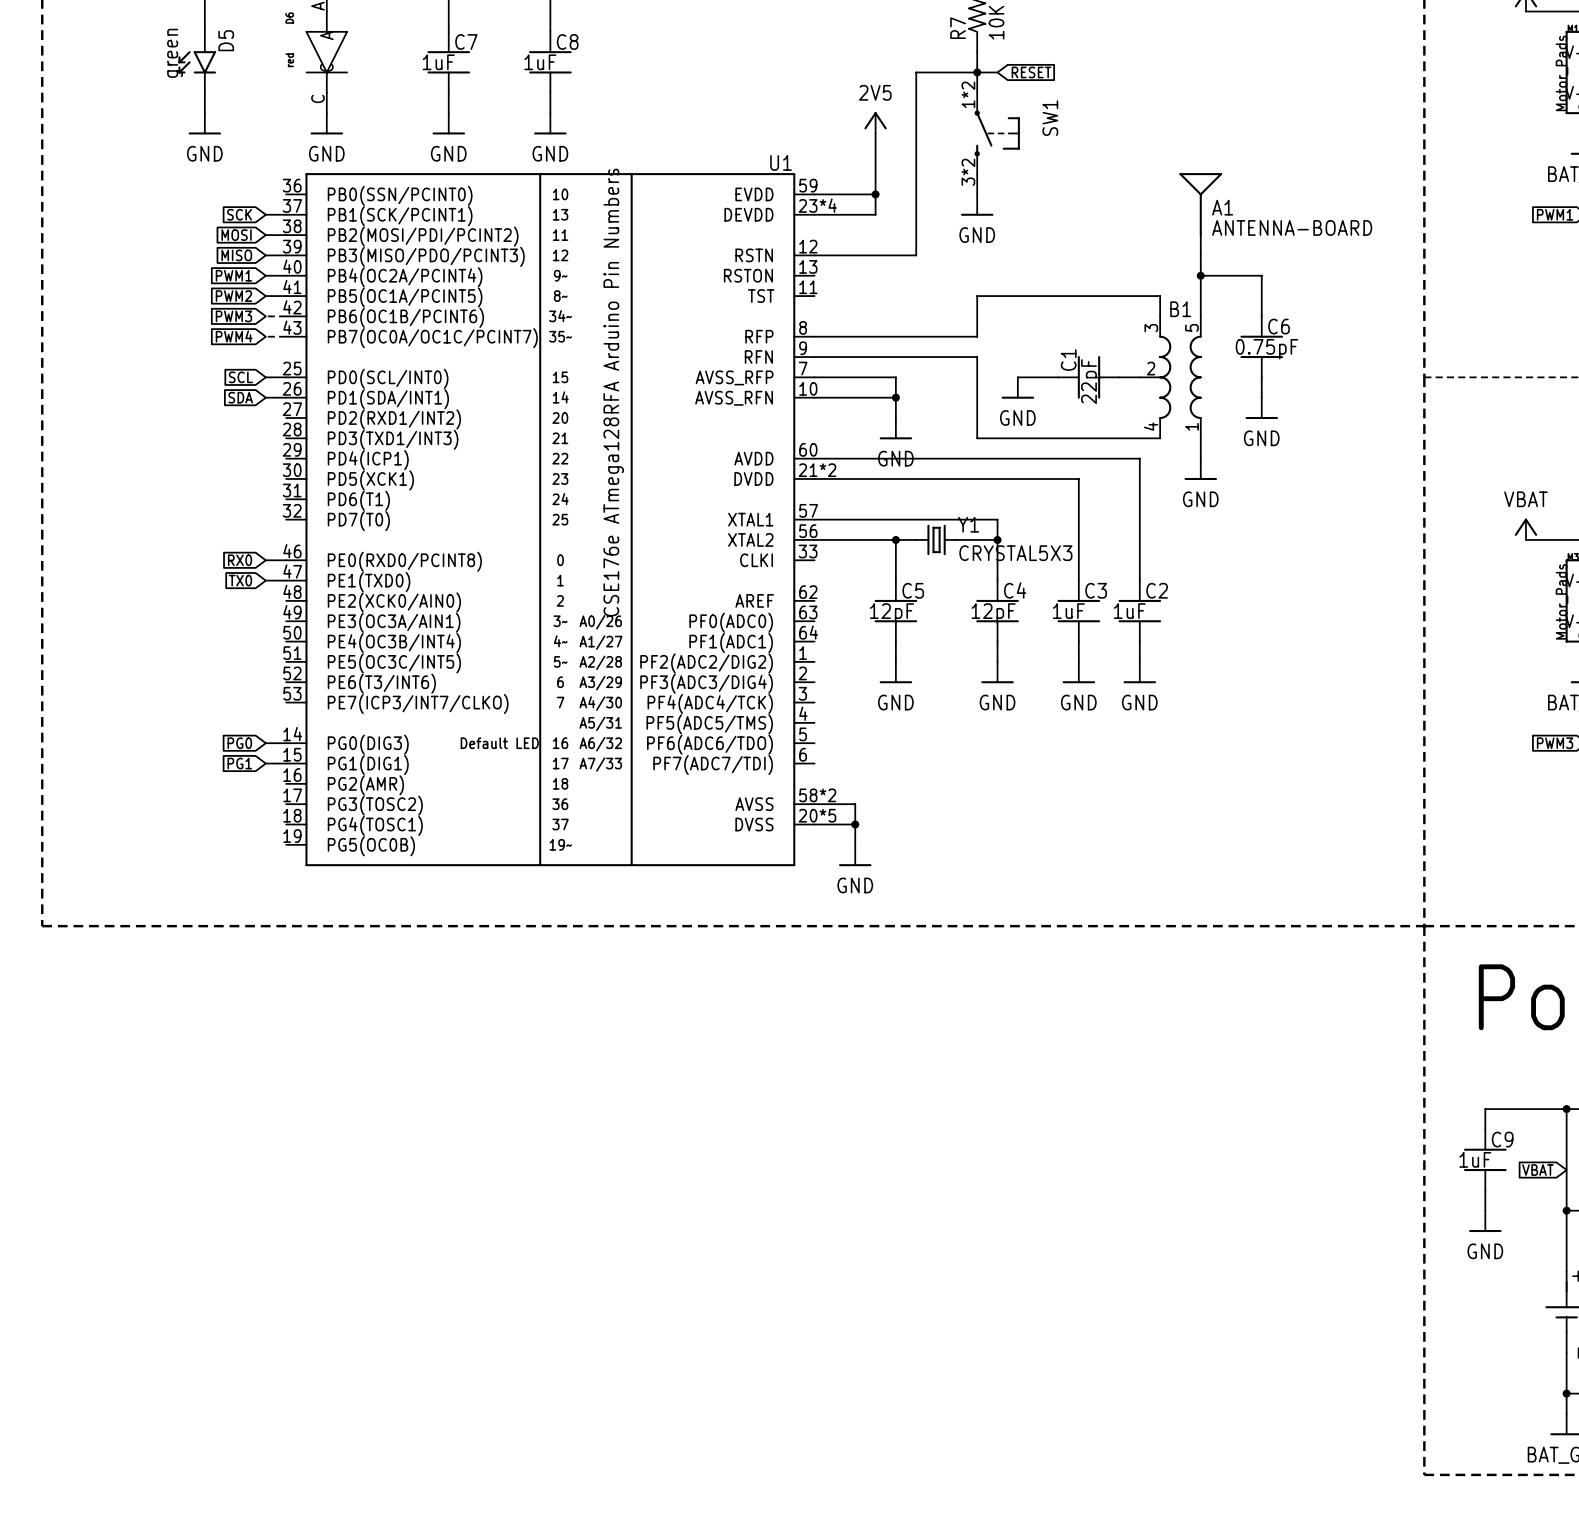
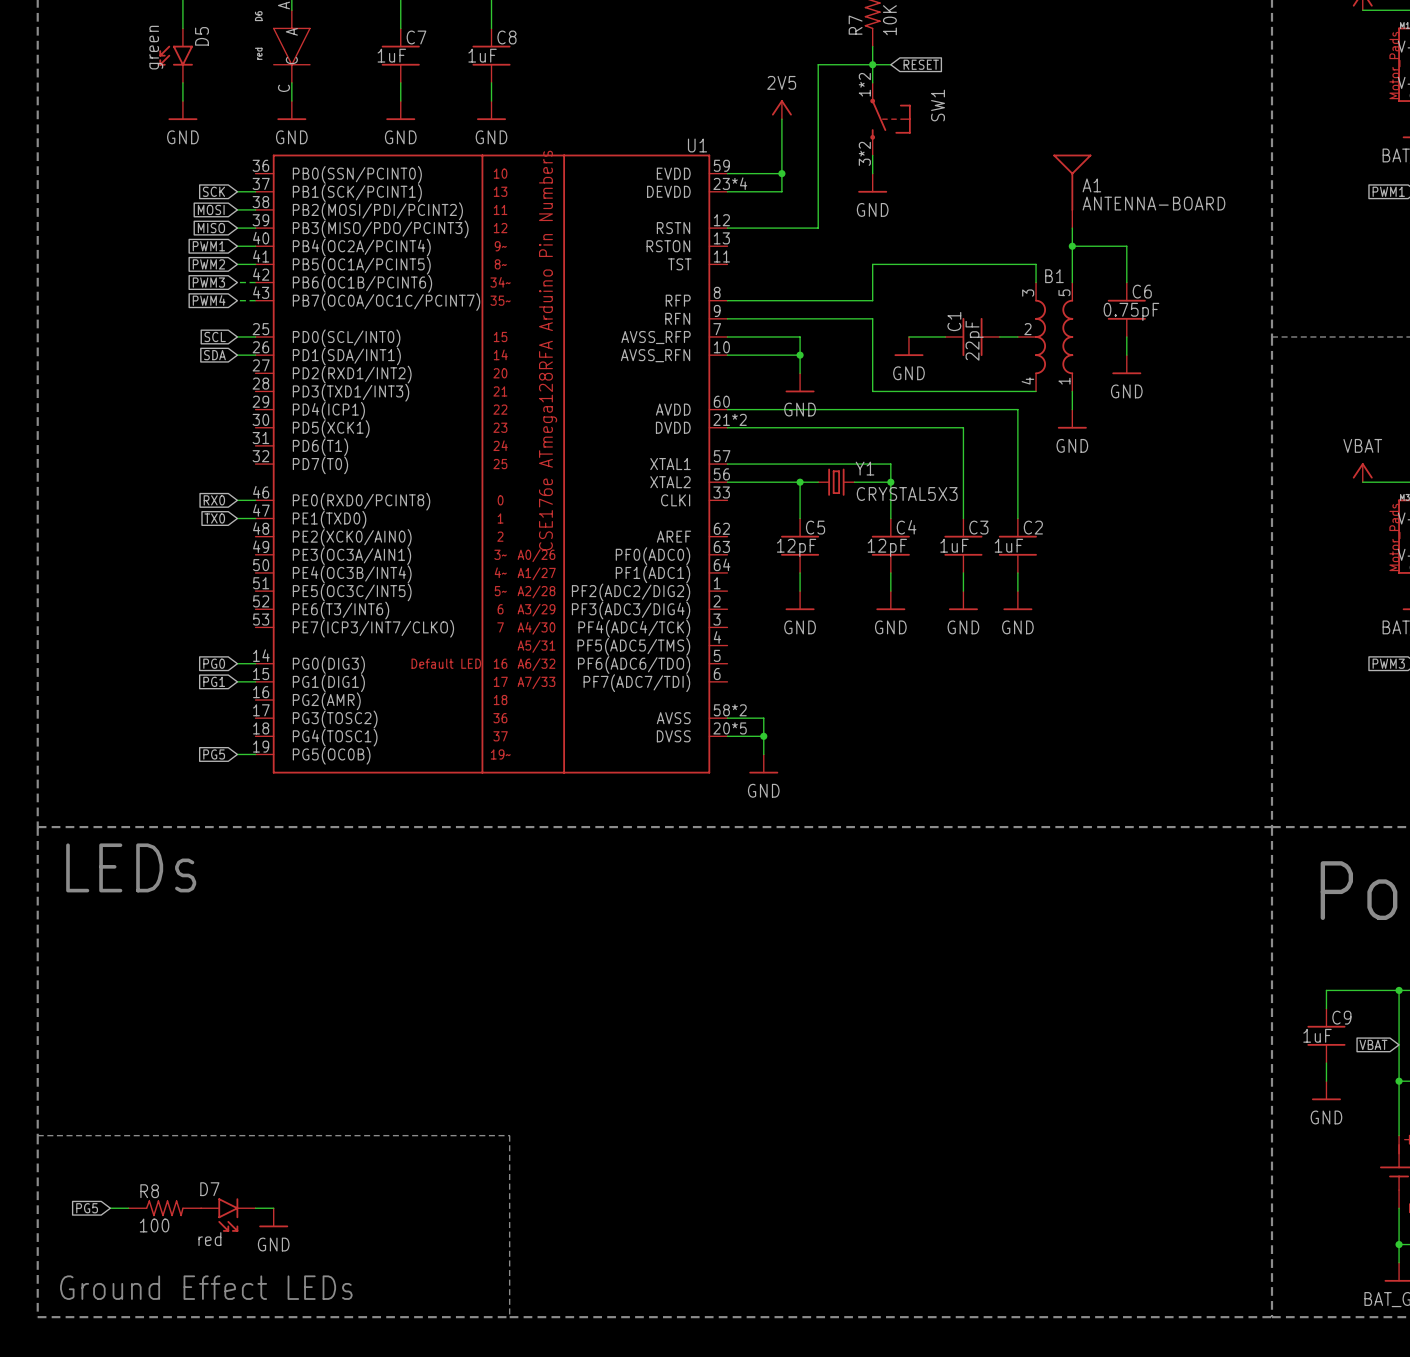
global label: none -> PG5 (214, 754)
wire: none -> (237, 754) (255, 754)
line: none -> (37, 827) (37, 1317) (1272, 1317)
text: none -> LEDs (131, 867)
line: none -> (37, 1135) (509, 1135) (509, 1317)
global label: none -> PG5 (87, 1208)
wire: none -> (110, 1208) (128, 1208)
R8: none -> 100 (164, 1208)
wire: none -> (255, 1208) (273, 1208)
D7: none -> red (228, 1215)
power symbol: none -> GND (273, 1217)
text: none -> Ground Effect LEDs (206, 1287)

